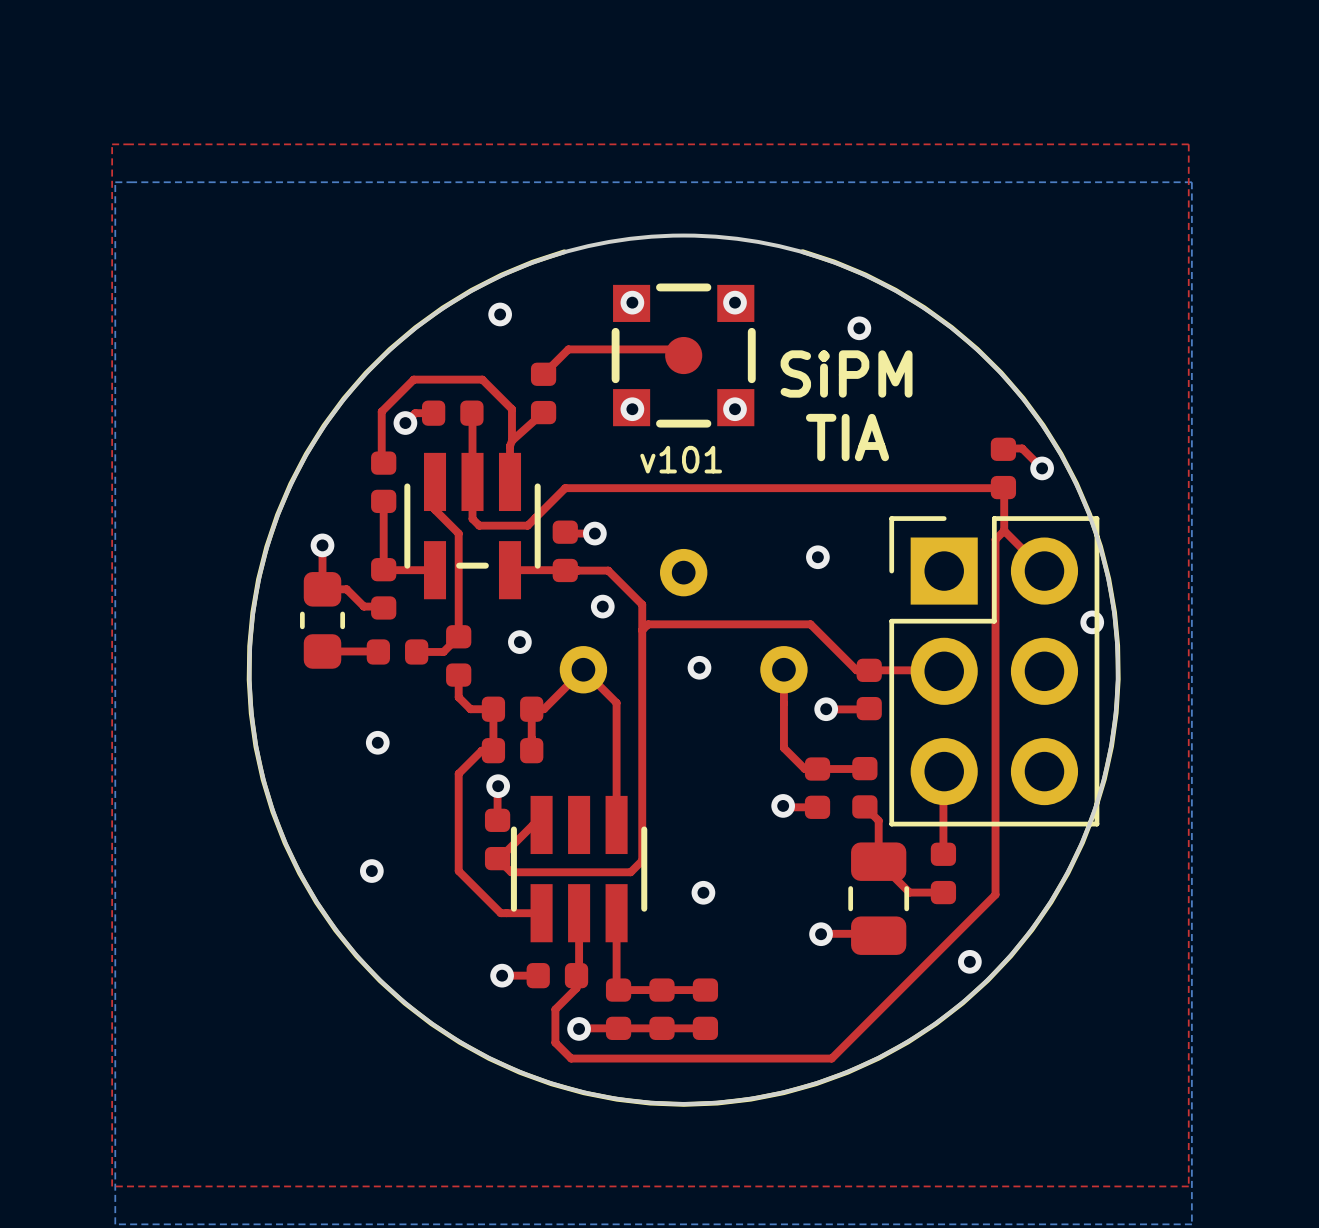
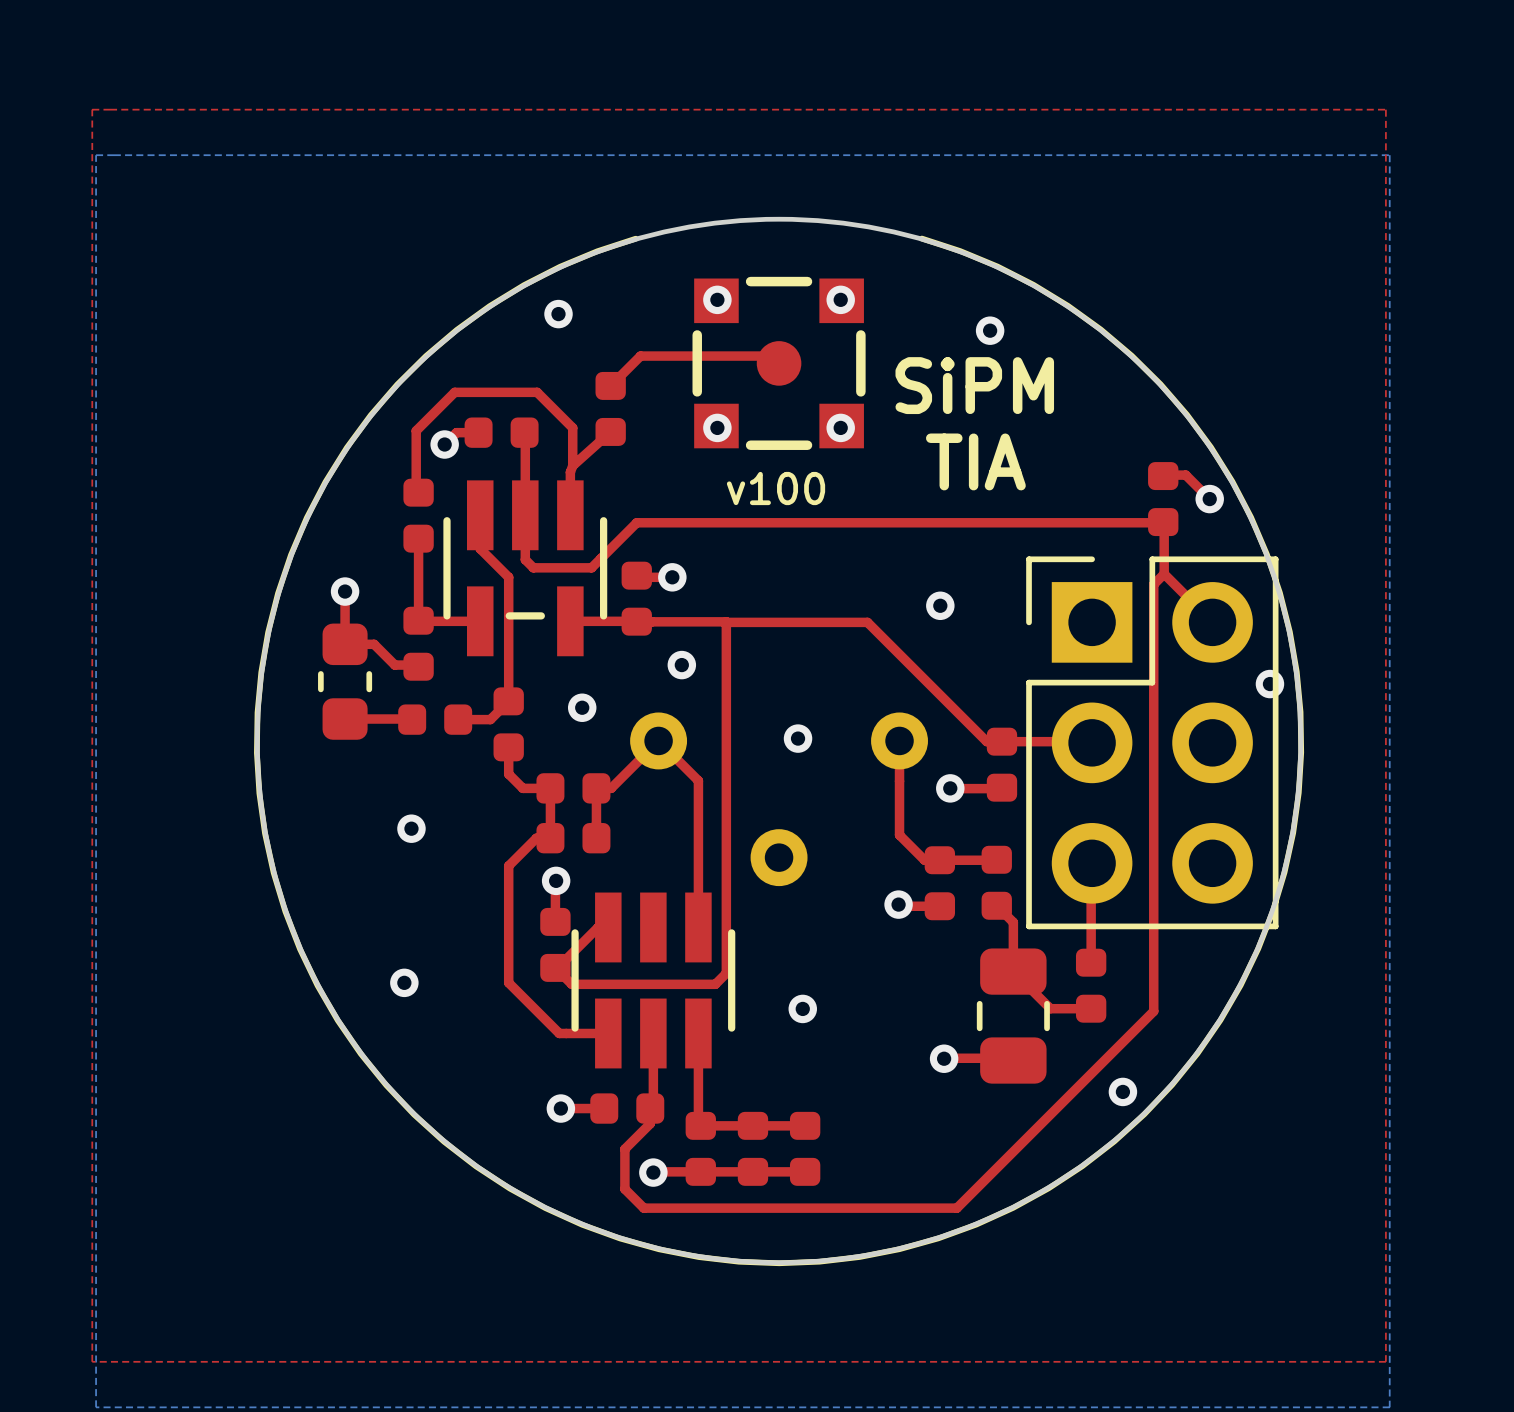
text: v101 (681, 459) -> v100 (776, 488)
top track: (608, 570) (642, 604) (642, 860) (639, 863) -> (726, 622) (726, 973)
top track: none -> (688, 621) (726, 621)
part rotation: 0° (683, 621) -> 180° (779, 799)
top track: (810, 624) (648, 624) (642, 630) -> (931, 686) (867, 622) (726, 622)

